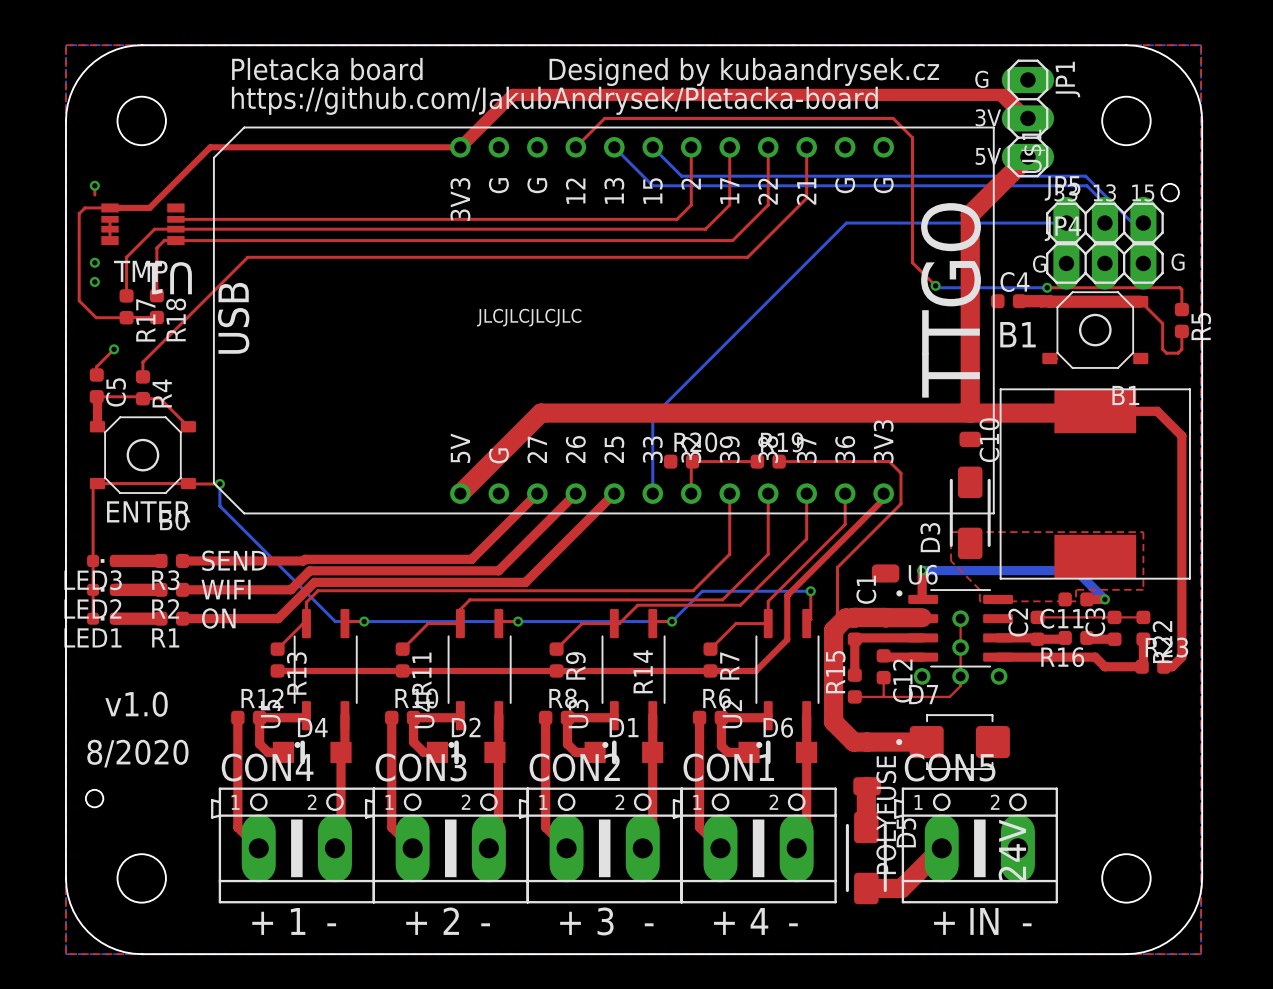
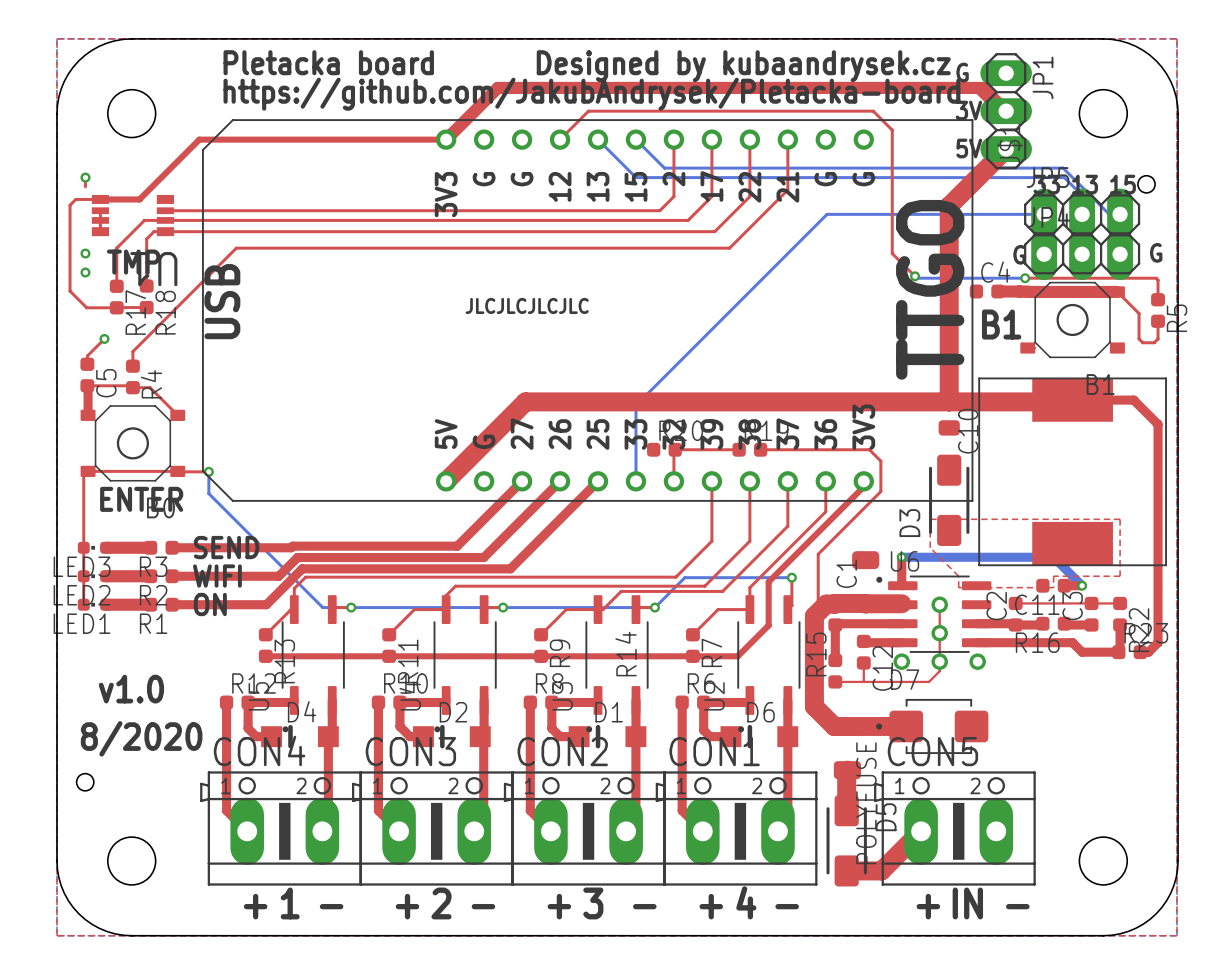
text: 24V (1012, 850) -> none

